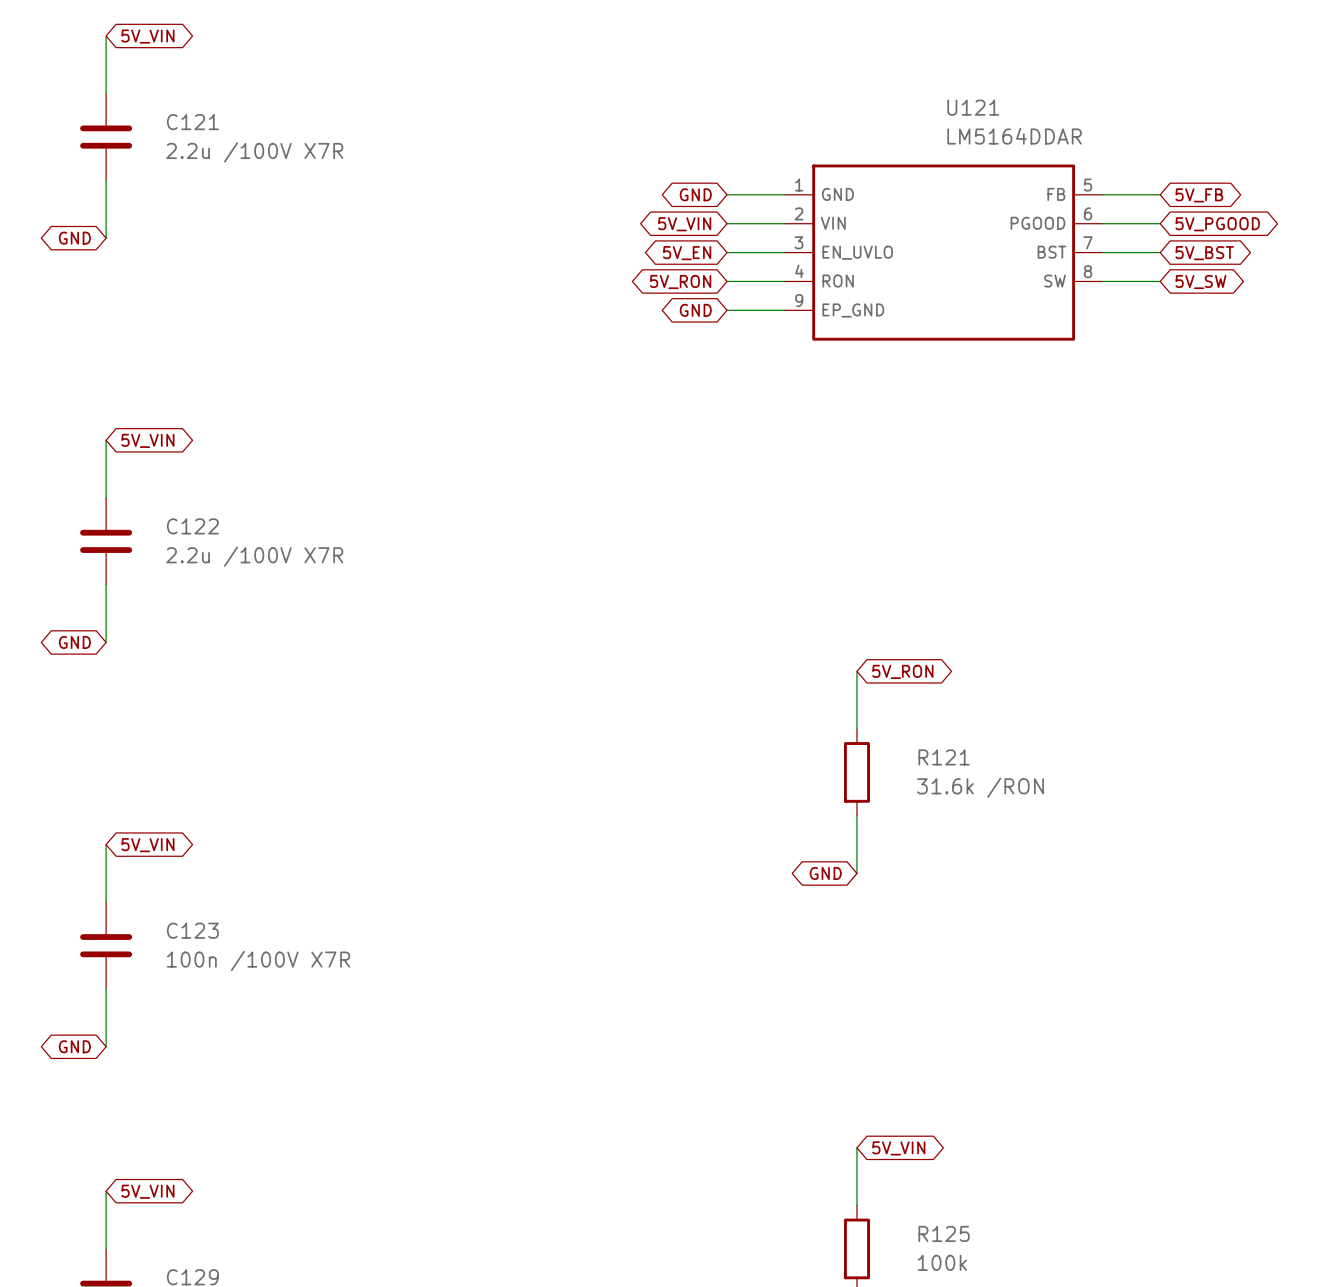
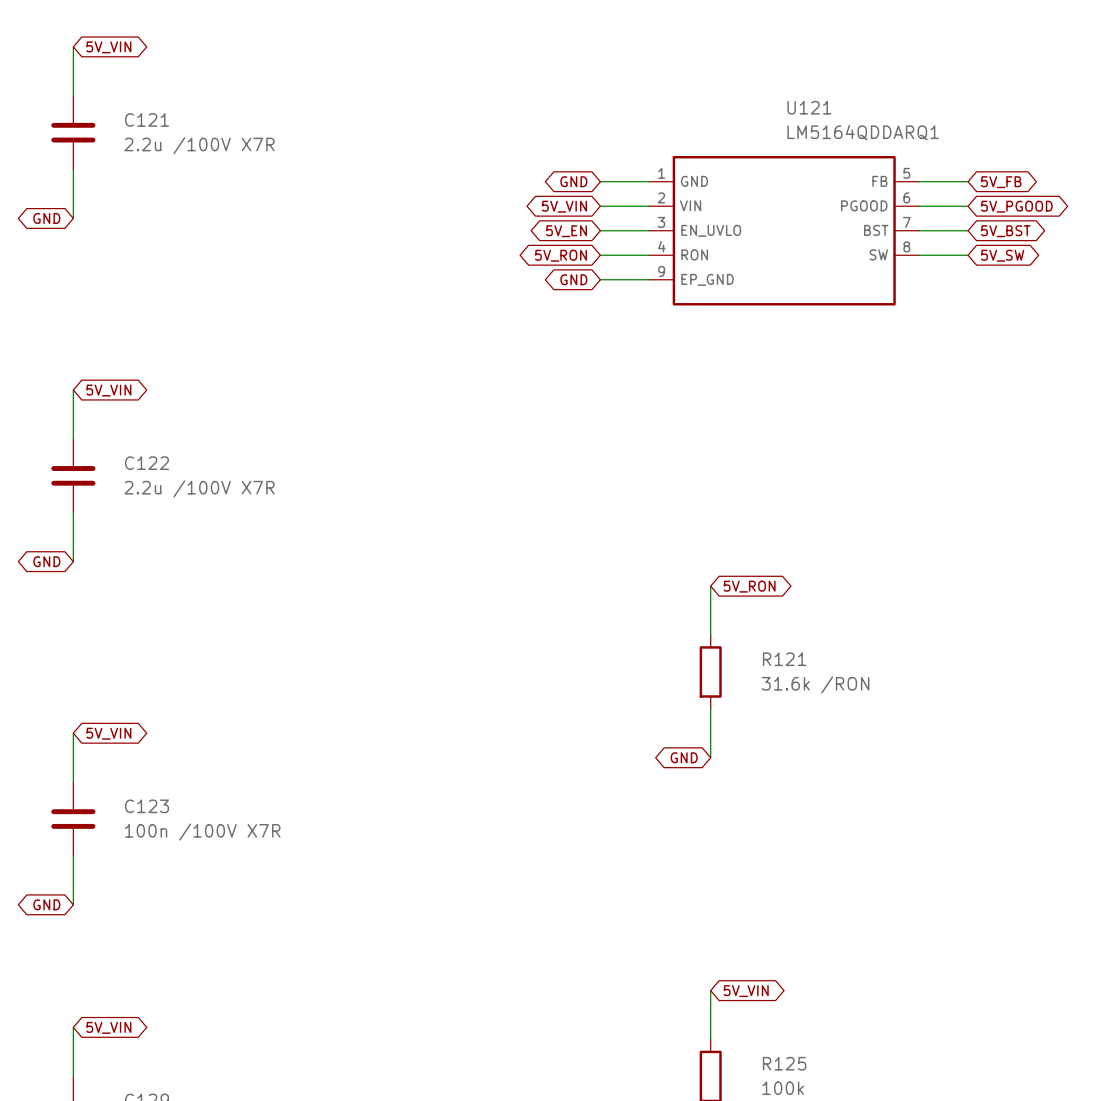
U121 value: LM5164DDAR (1014, 136) -> LM5164QDDARQ1 (863, 132)

